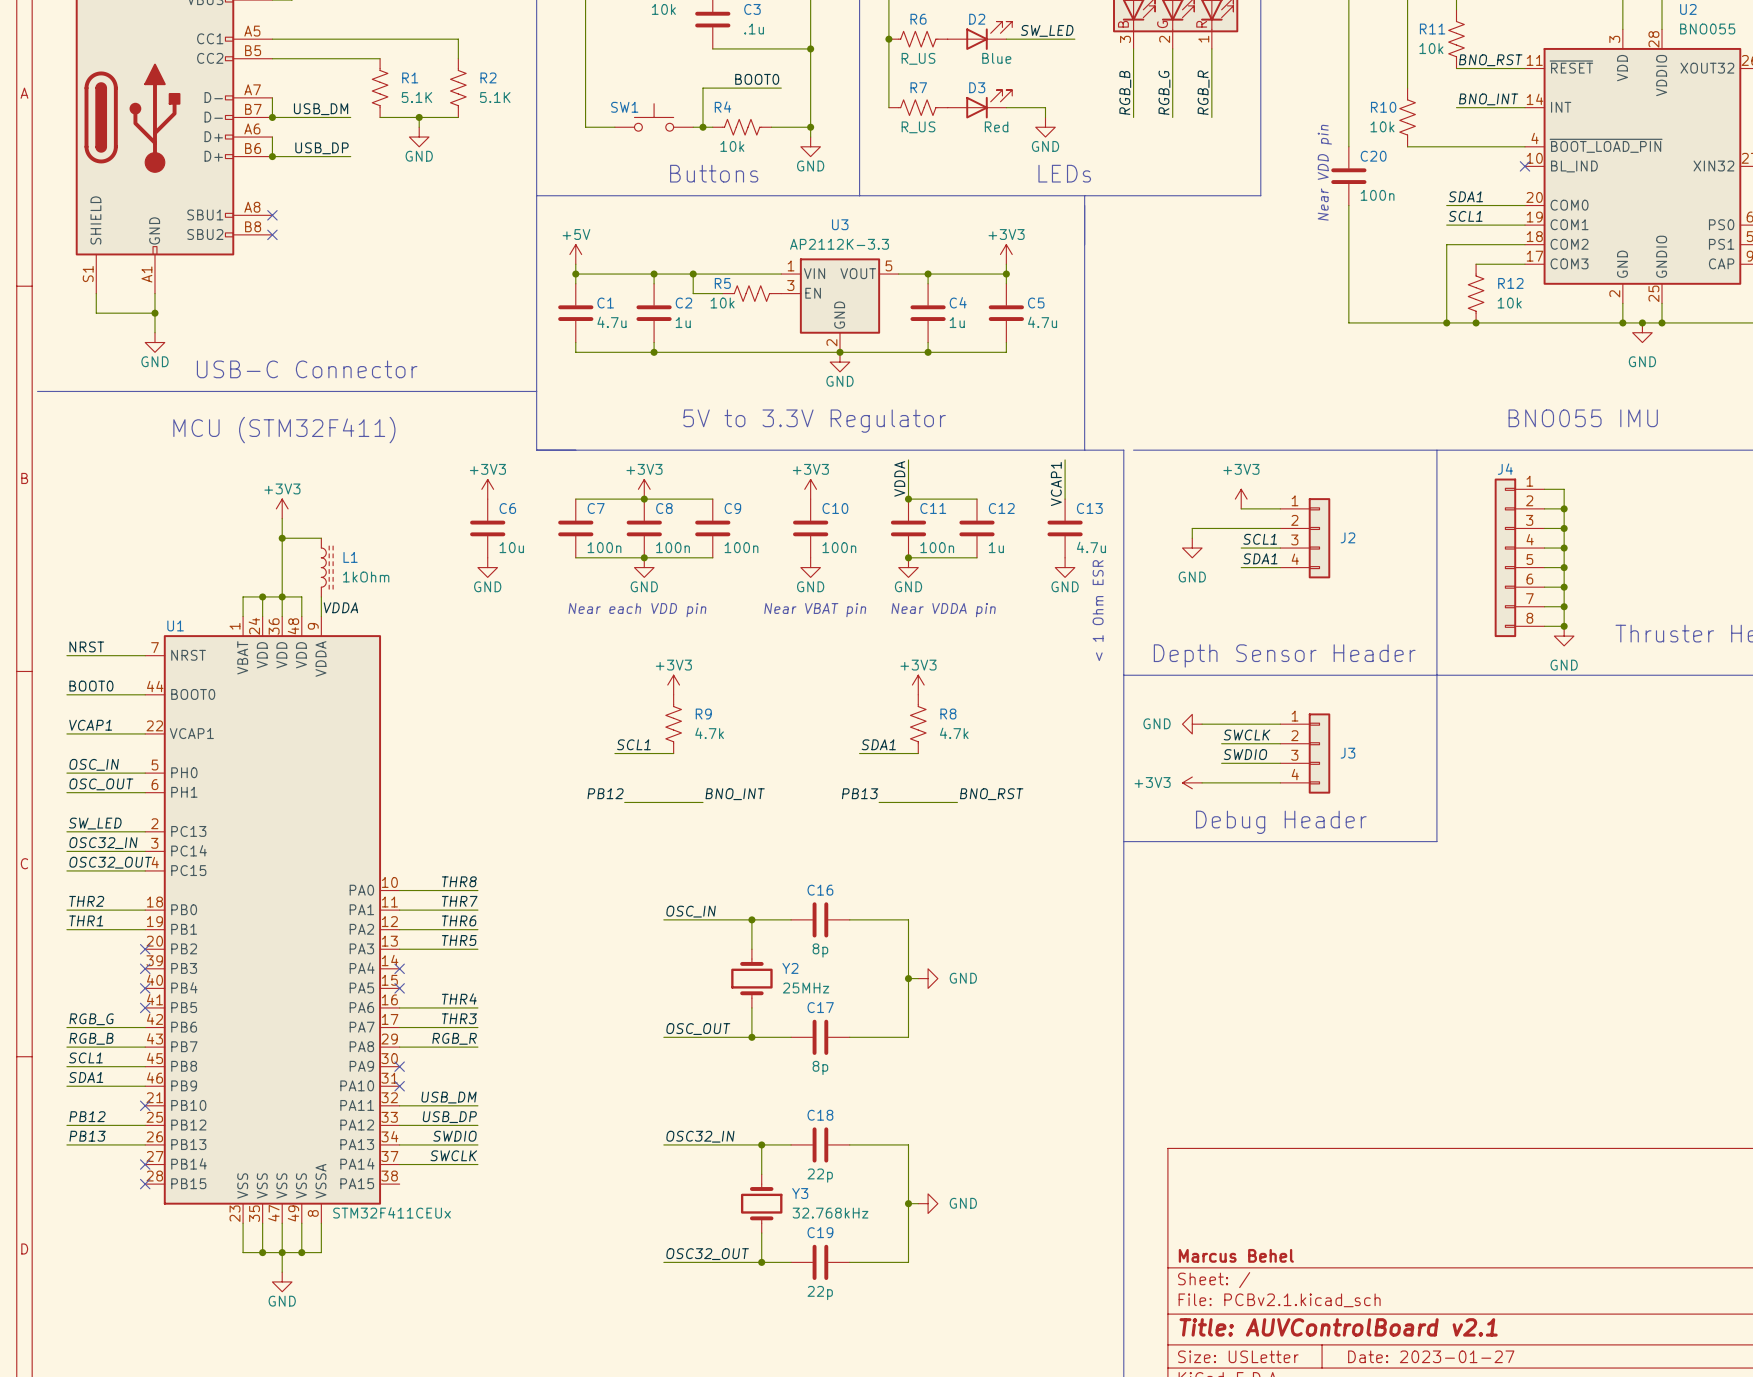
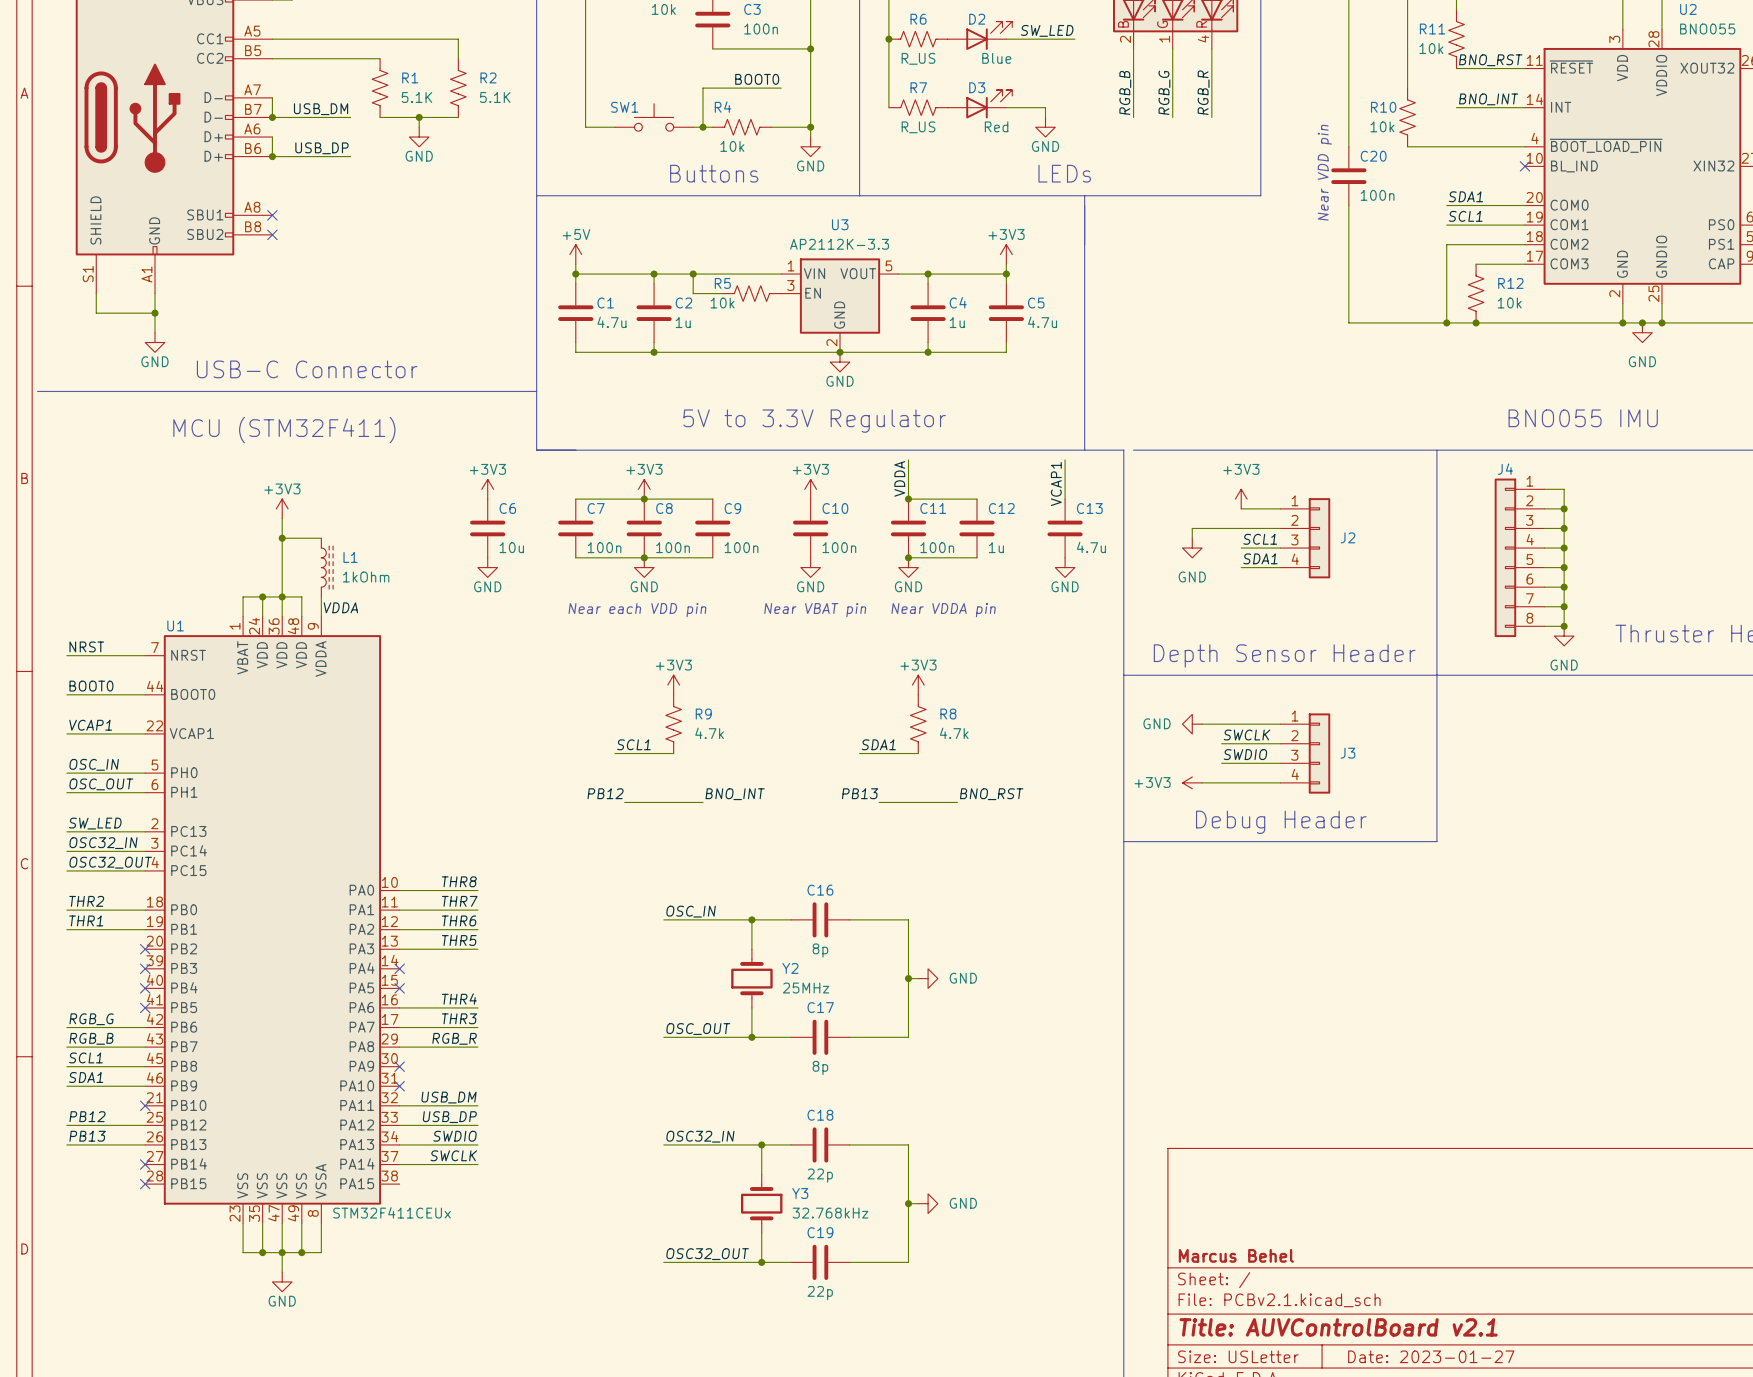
C3 value: .1u (754, 29) -> 100n (761, 29)
part pin number: 3 (1125, 39) -> 2 (1125, 39)
part pin number: 2 (1164, 39) -> 1 (1164, 39)
part pin number: 1 (1203, 39) -> 4 (1203, 38)
text: < 1 Ohm ESR (1098, 610) -> none

